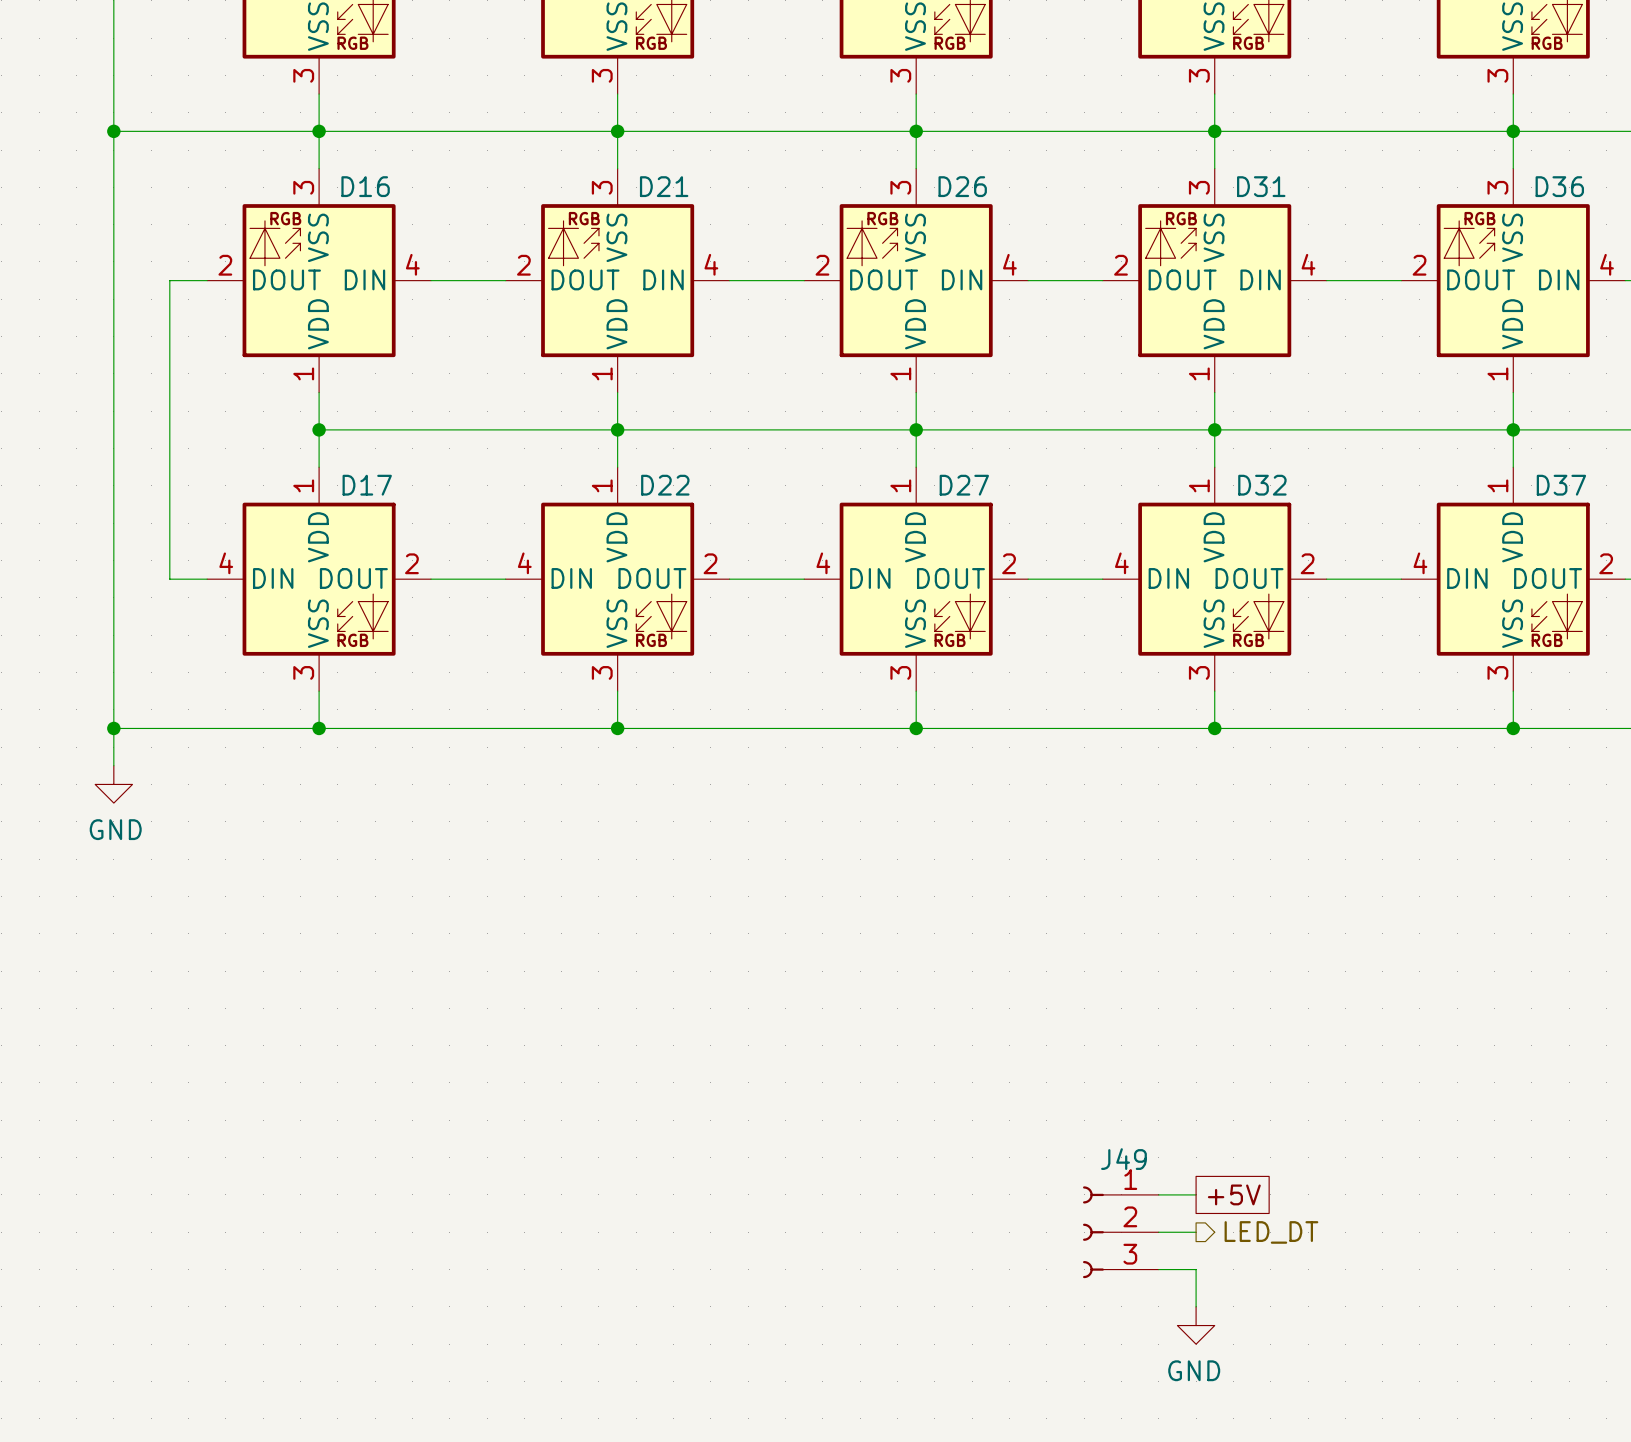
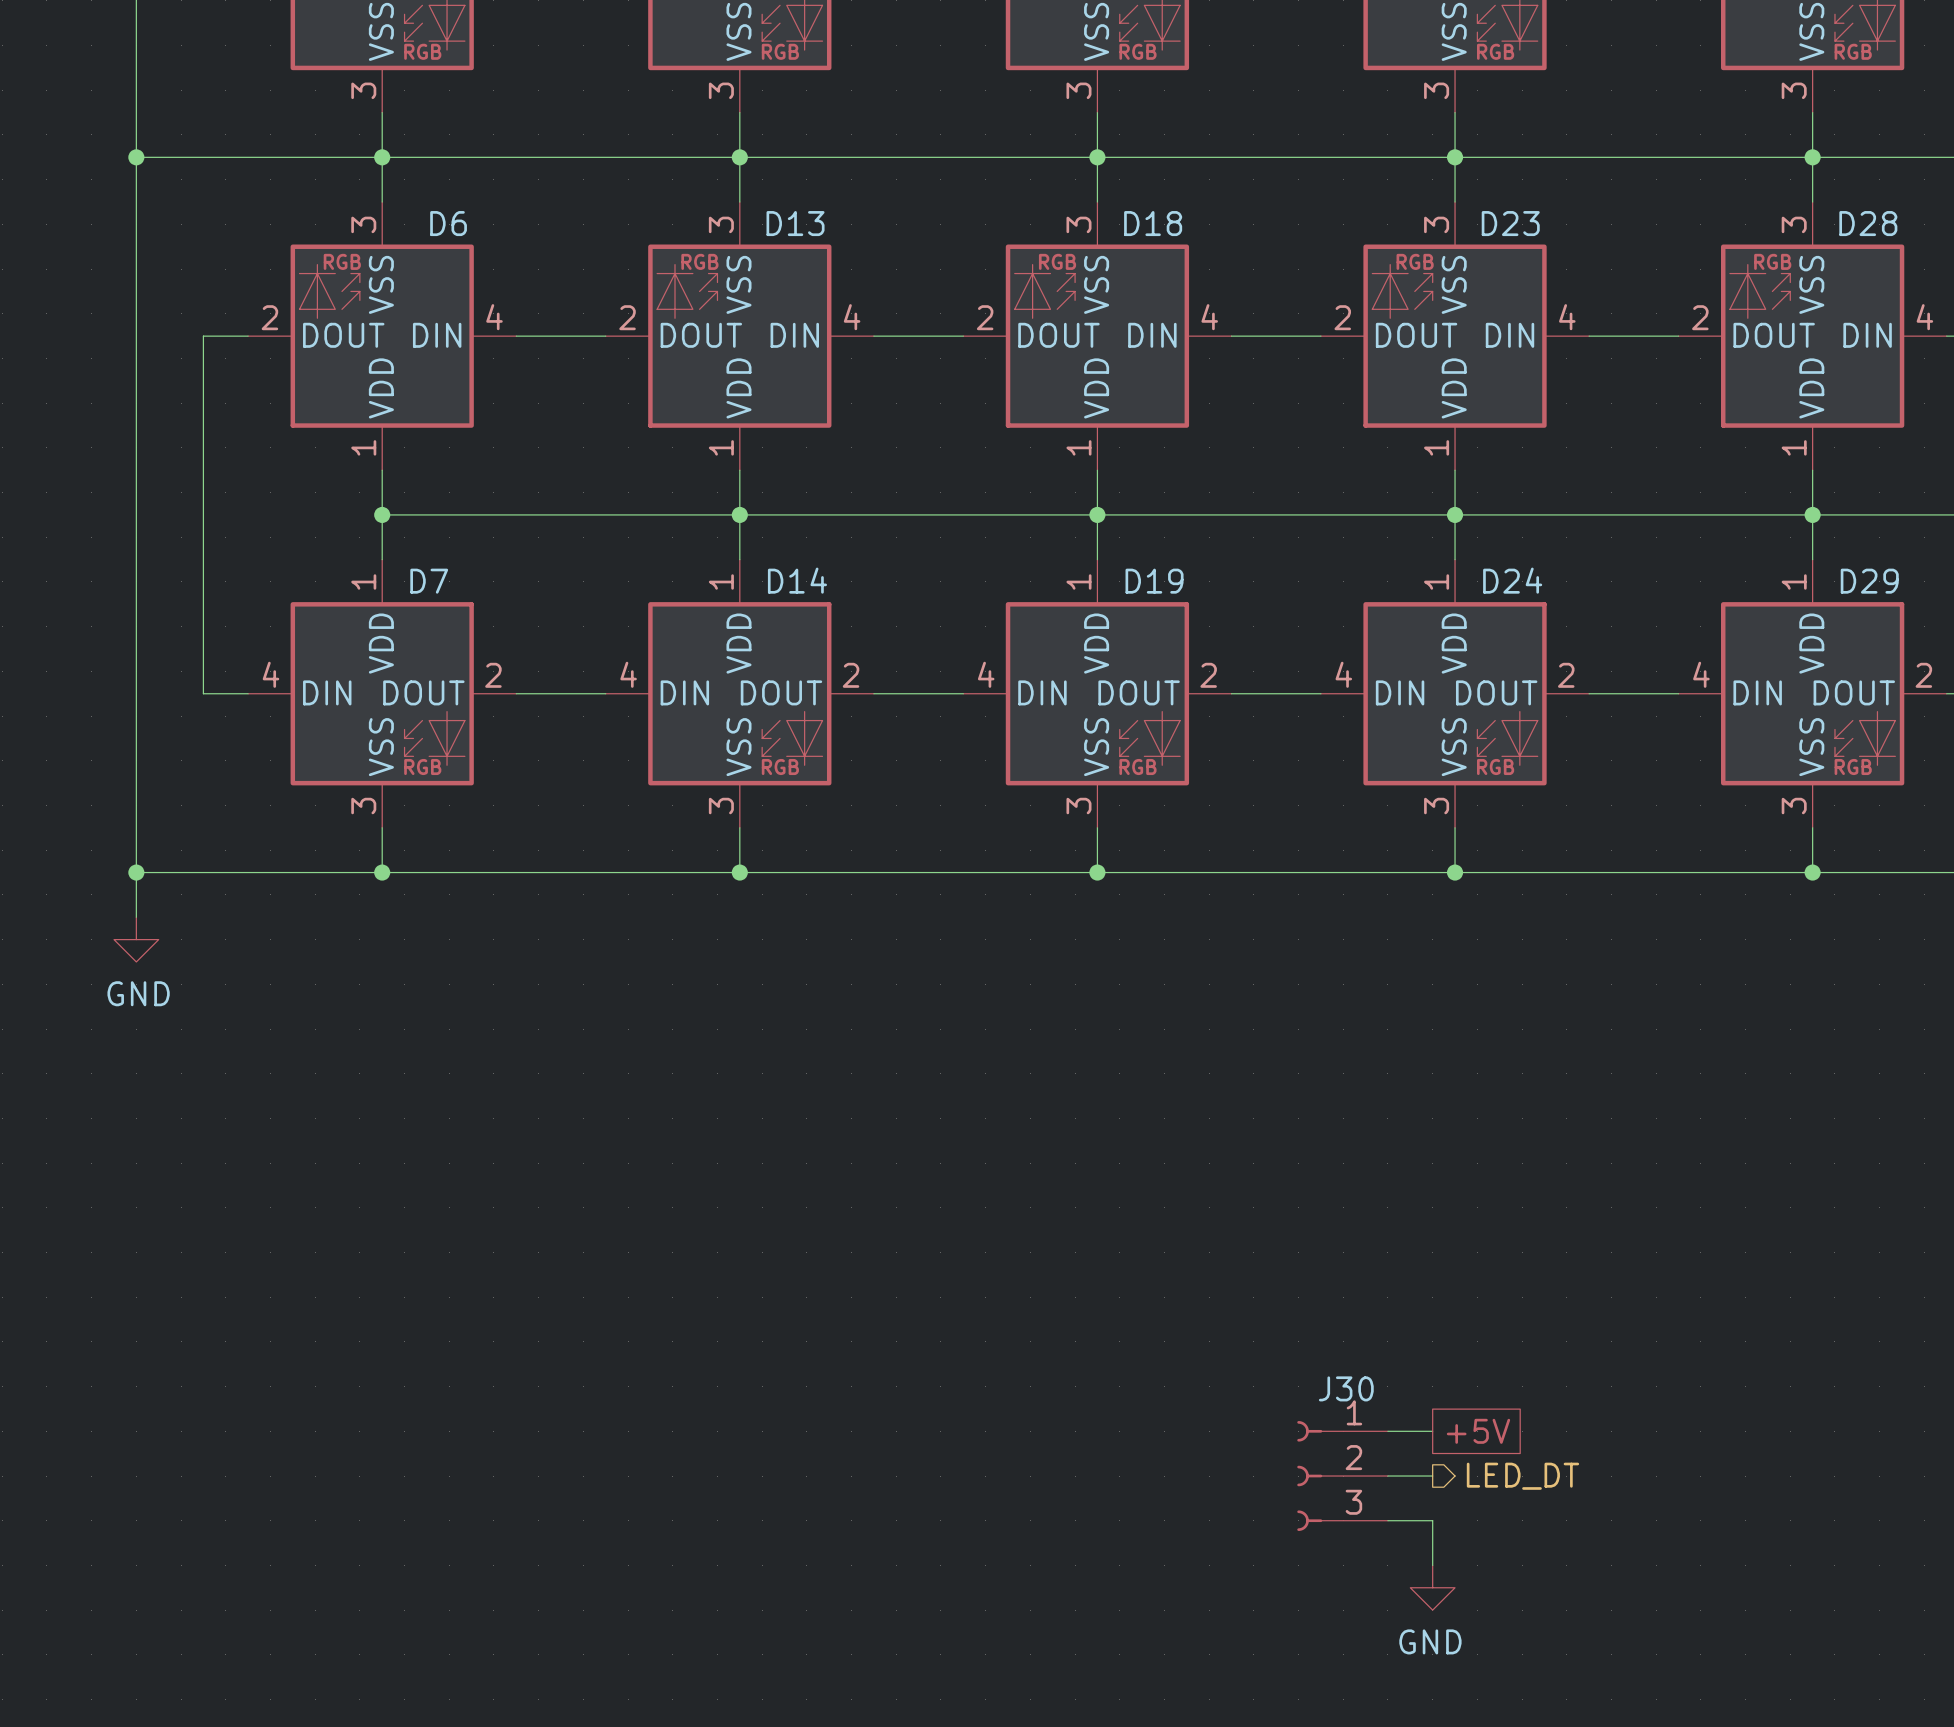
D16 name: D16 (365, 186) -> D6 (448, 223)
D21 name: D21 (664, 186) -> D13 (795, 223)
D26 name: D26 (962, 186) -> D18 (1153, 223)
D31 name: D31 (1261, 186) -> D23 (1510, 223)
D36 name: D36 (1559, 186) -> D28 (1868, 223)
D17 name: D17 (367, 485) -> D7 (429, 581)
D22 name: D22 (665, 485) -> D14 (797, 580)
D27 name: D27 (964, 485) -> D19 (1154, 581)
D32 name: D32 (1262, 485) -> D24 (1512, 580)
D37 name: D37 (1561, 485) -> D29 (1869, 581)
J49 name: J49 (1123, 1159) -> J30 (1346, 1388)

